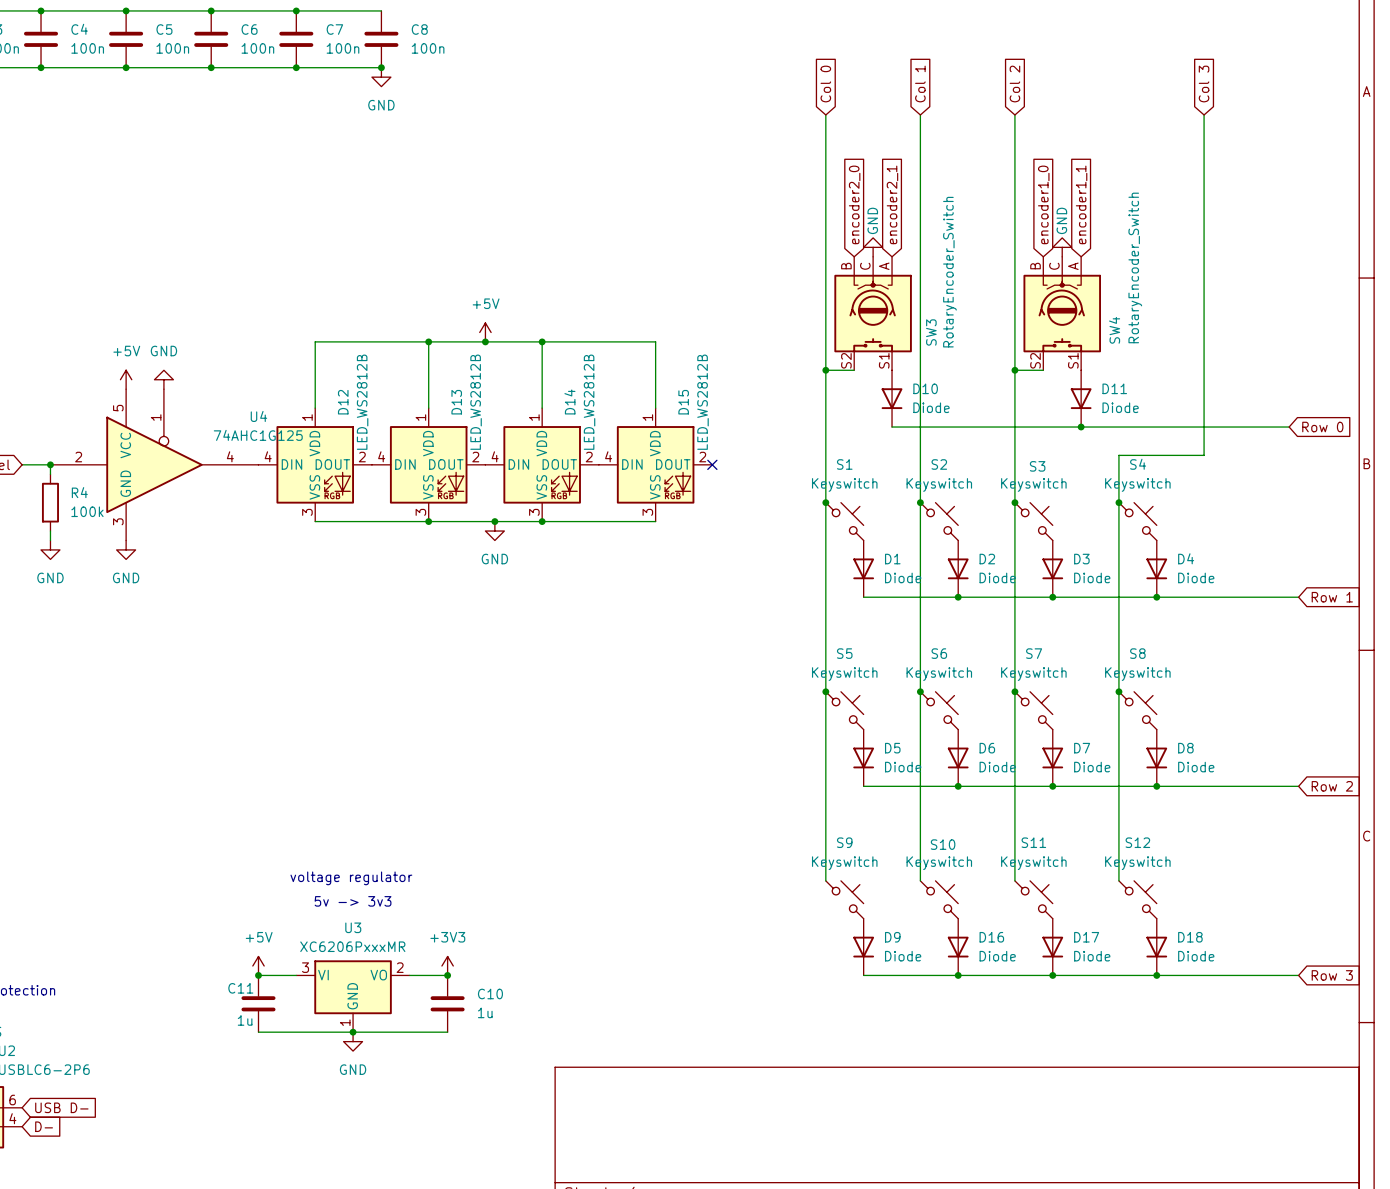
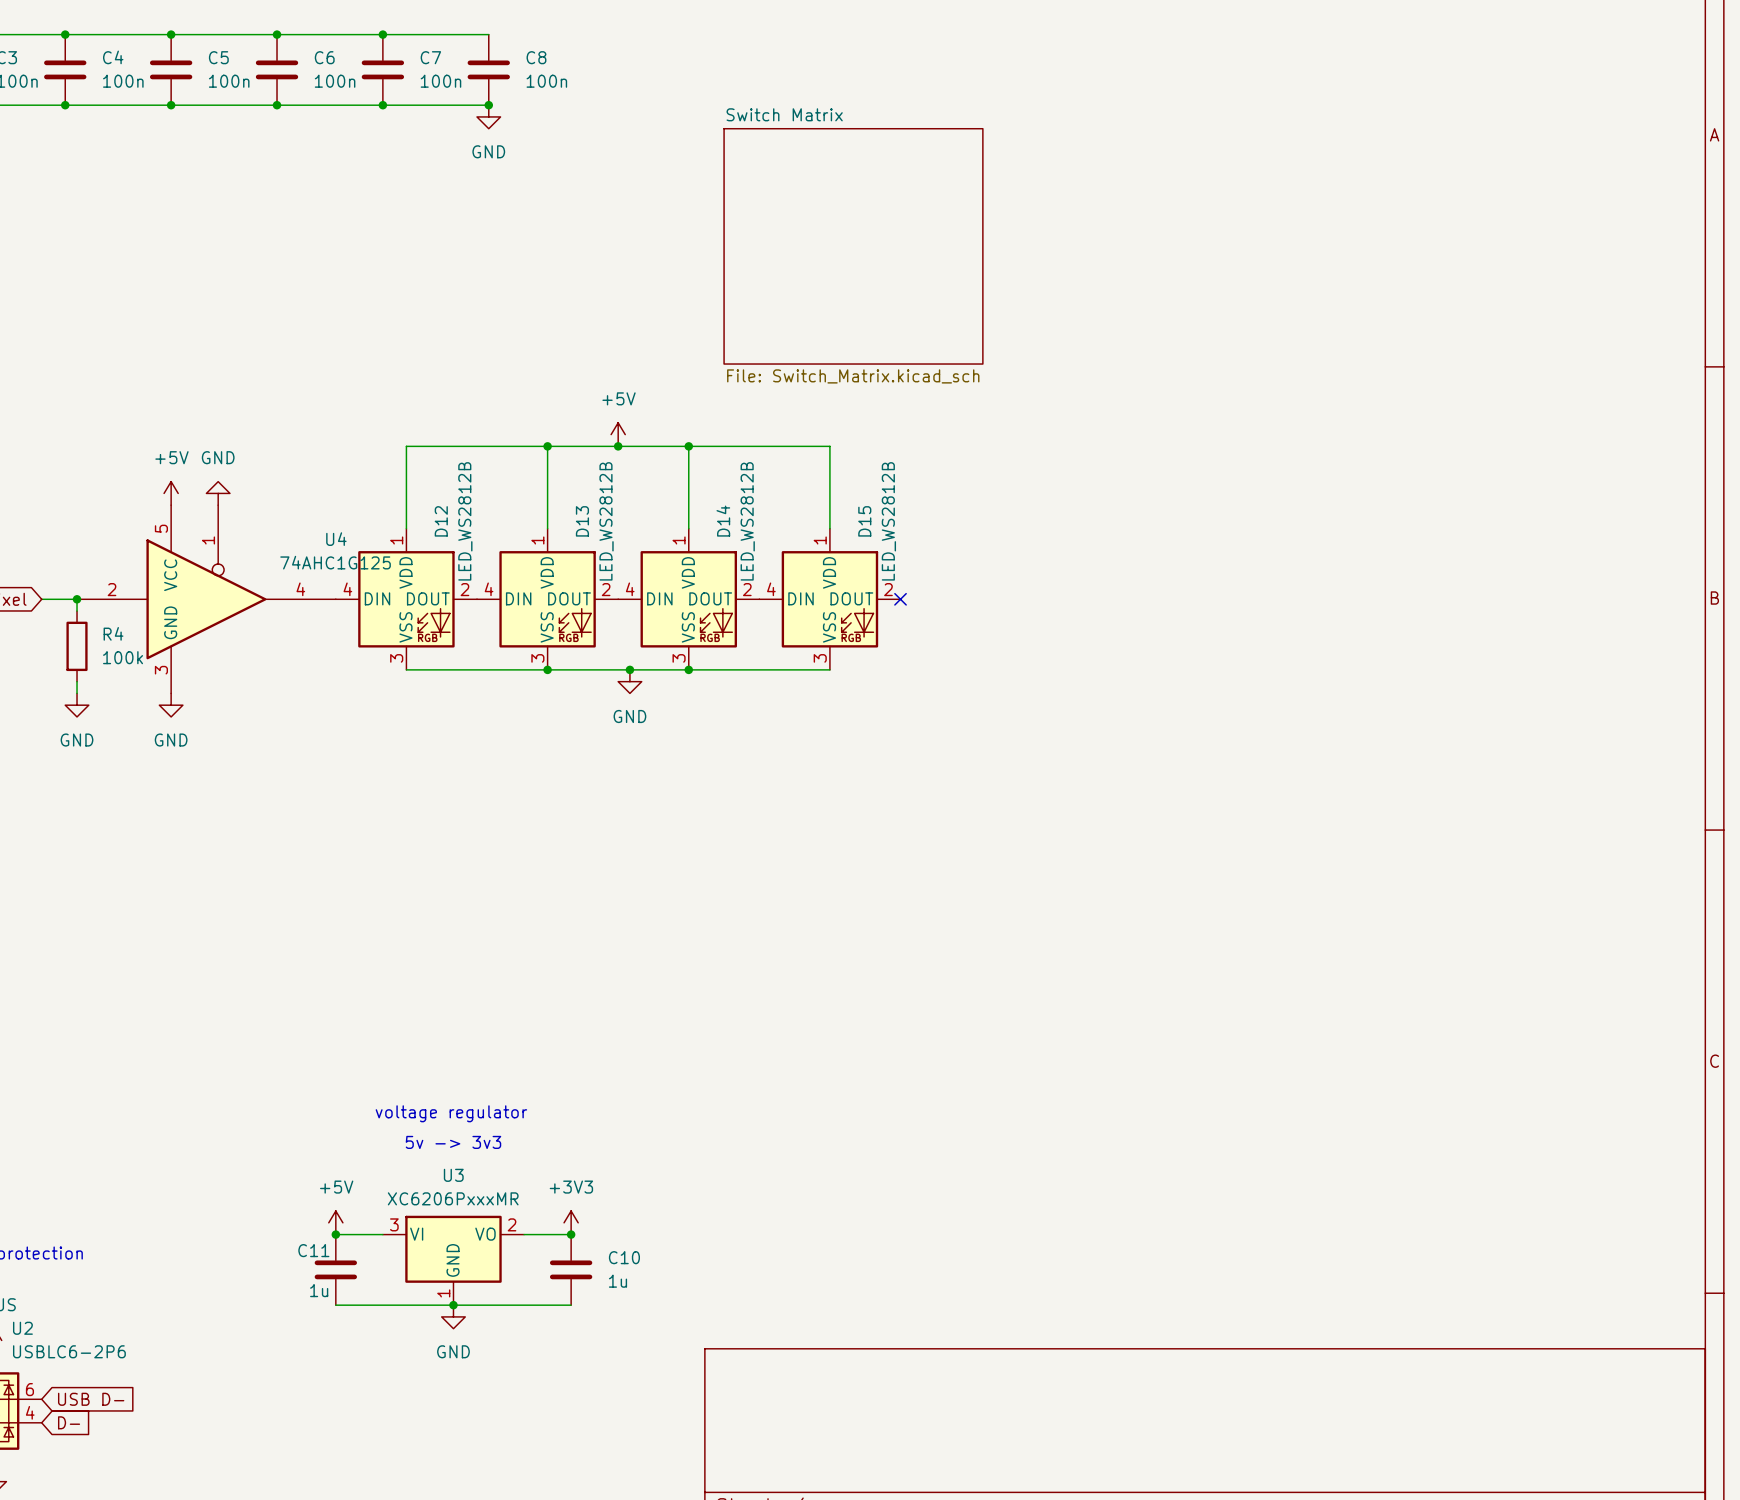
global label: Col 0 (825, 84) -> none
global label: Col 1 (920, 84) -> none
global label: Col 2 (1014, 84) -> none
global label: Col 3 (1204, 84) -> none
wire: (825, 114) (825, 880) -> none
wire: (920, 114) (920, 880) -> none
wire: (1014, 114) (1014, 880) -> none
wire: (1204, 114) (1204, 455) (1118, 455) (1118, 880) -> none
sheet Switch Matrix: none -> File: Switch_Matrix.kicad_sch (853, 246)
global label: encoder2_0 (854, 204) -> none
global label: encoder2_1 (892, 204) -> none
global label: encoder1_0 (1043, 204) -> none
global label: encoder1_1 (1081, 204) -> none
power symbol: GND (873, 247) -> none
power symbol: GND (1062, 247) -> none
SW3: RotaryEncoder_Switch (873, 313) -> none
SW4: RotaryEncoder_Switch (1062, 313) -> none
wire: (825, 370) (854, 370) -> none
junction: (825, 370) -> none
wire: (1014, 370) (1043, 370) -> none
junction: (1014, 370) -> none
D10: Diode (892, 398) -> none
D11: Diode (1081, 398) -> none
wire: (892, 427) (1289, 427) -> none
junction: (1081, 427) -> none
global label: Row 0 (1322, 427) -> none
junction: (825, 502) -> none
junction: (920, 502) -> none
junction: (1014, 502) -> none
junction: (1118, 502) -> none
S1: Keyswitch (844, 521) -> none
S2: Keyswitch (939, 521) -> none
S3: Keyswitch (1033, 521) -> none
S4: Keyswitch (1137, 521) -> none
D1: Diode (863, 568) -> none
D2: Diode (958, 568) -> none
D3: Diode (1052, 568) -> none
D4: Diode (1156, 568) -> none
wire: (863, 597) (1298, 597) -> none
junction: (958, 597) -> none
junction: (1052, 597) -> none
junction: (1156, 597) -> none
global label: Row 1 (1332, 597) -> none
junction: (825, 691) -> none
junction: (920, 691) -> none
junction: (1014, 691) -> none
junction: (1118, 691) -> none
S5: Keyswitch (844, 710) -> none
S6: Keyswitch (939, 710) -> none
S7: Keyswitch (1033, 710) -> none
S8: Keyswitch (1137, 710) -> none
D5: Diode (863, 757) -> none
D6: Diode (958, 757) -> none
D7: Diode (1052, 757) -> none
D8: Diode (1156, 757) -> none
wire: (863, 786) (1298, 786) -> none
junction: (958, 786) -> none
junction: (1052, 786) -> none
junction: (1156, 786) -> none
global label: Row 2 (1332, 786) -> none
S9: Keyswitch (844, 899) -> none
S10: Keyswitch (939, 899) -> none
S11: Keyswitch (1033, 899) -> none
S12: Keyswitch (1137, 899) -> none
D9: Diode (863, 947) -> none
D16: Diode (958, 947) -> none
D17: Diode (1052, 947) -> none
D18: Diode (1156, 947) -> none
wire: (863, 975) (1298, 975) -> none
junction: (958, 975) -> none
junction: (1052, 975) -> none
junction: (1156, 975) -> none
global label: Row 3 (1332, 975) -> none

